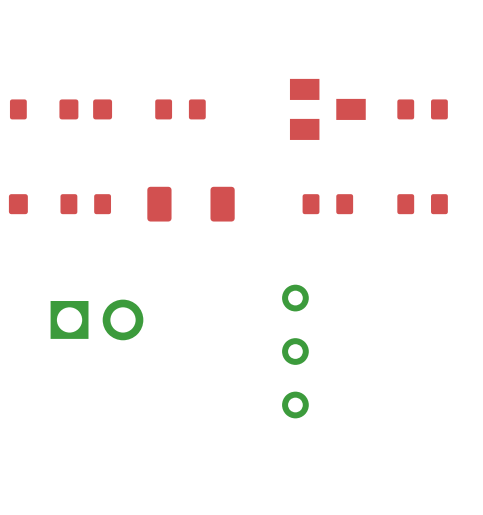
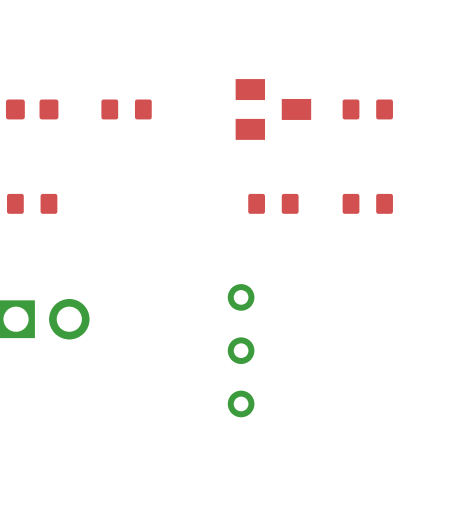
part: (191, 204) -> none

